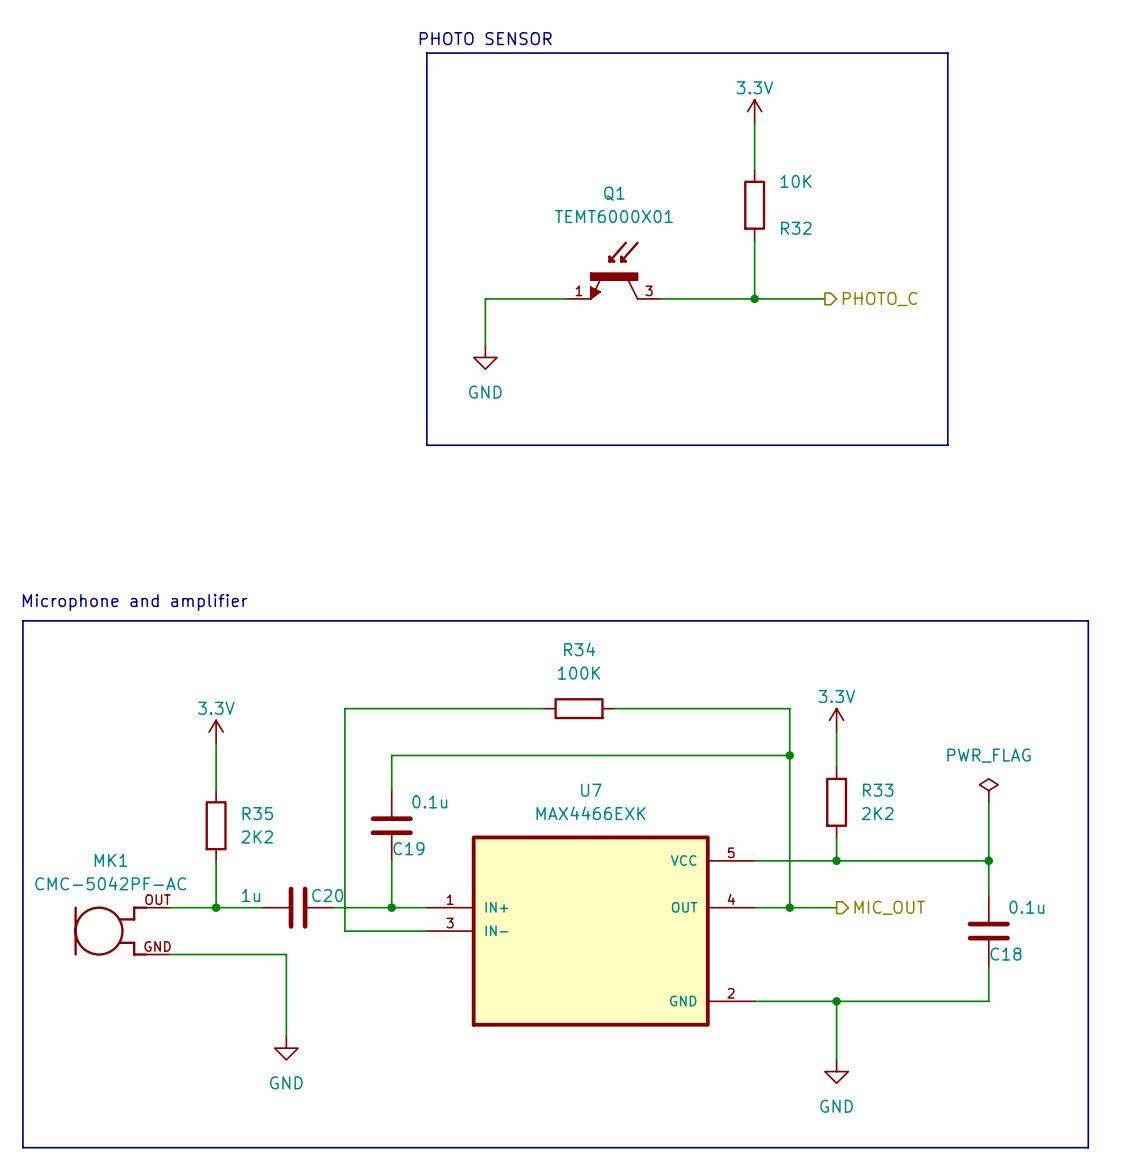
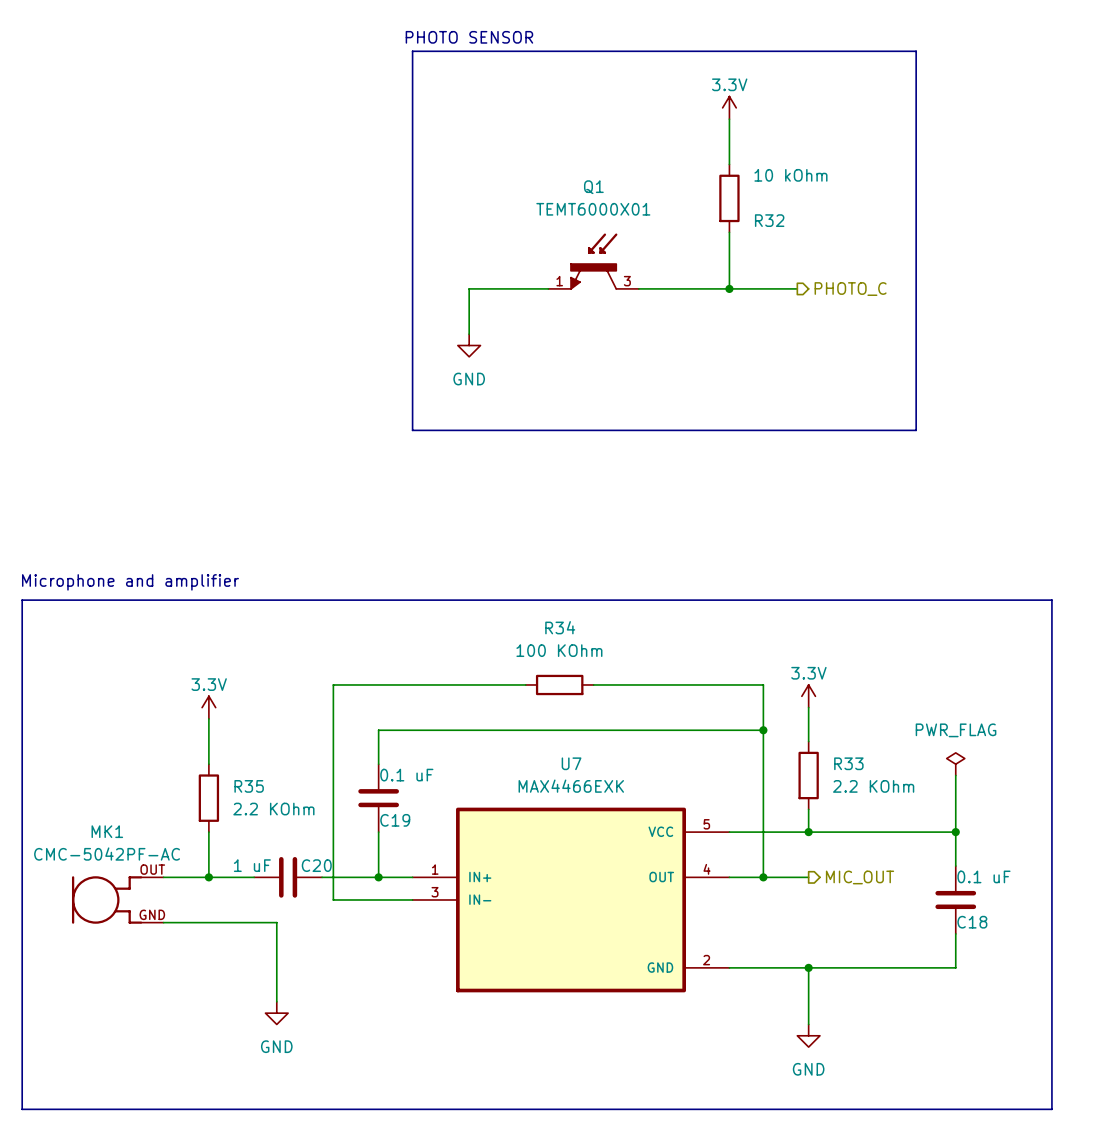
R32 value: 10K (795, 181) -> 10 kOhm (790, 175)
R34 value: 100K (579, 673) -> 100 KOhm (559, 650)
C19 value: 0.1u (429, 801) -> 0.1 uF (406, 775)
R33 value: 2K2 (877, 813) -> 2.2 KOhm (873, 786)
R35 value: 2K2 (257, 837) -> 2.2 KOhm (273, 809)
C20 value: 1u (251, 895) -> 1 uF (252, 865)
C18 value: 0.1u (1026, 907) -> 0.1 uF (983, 876)

